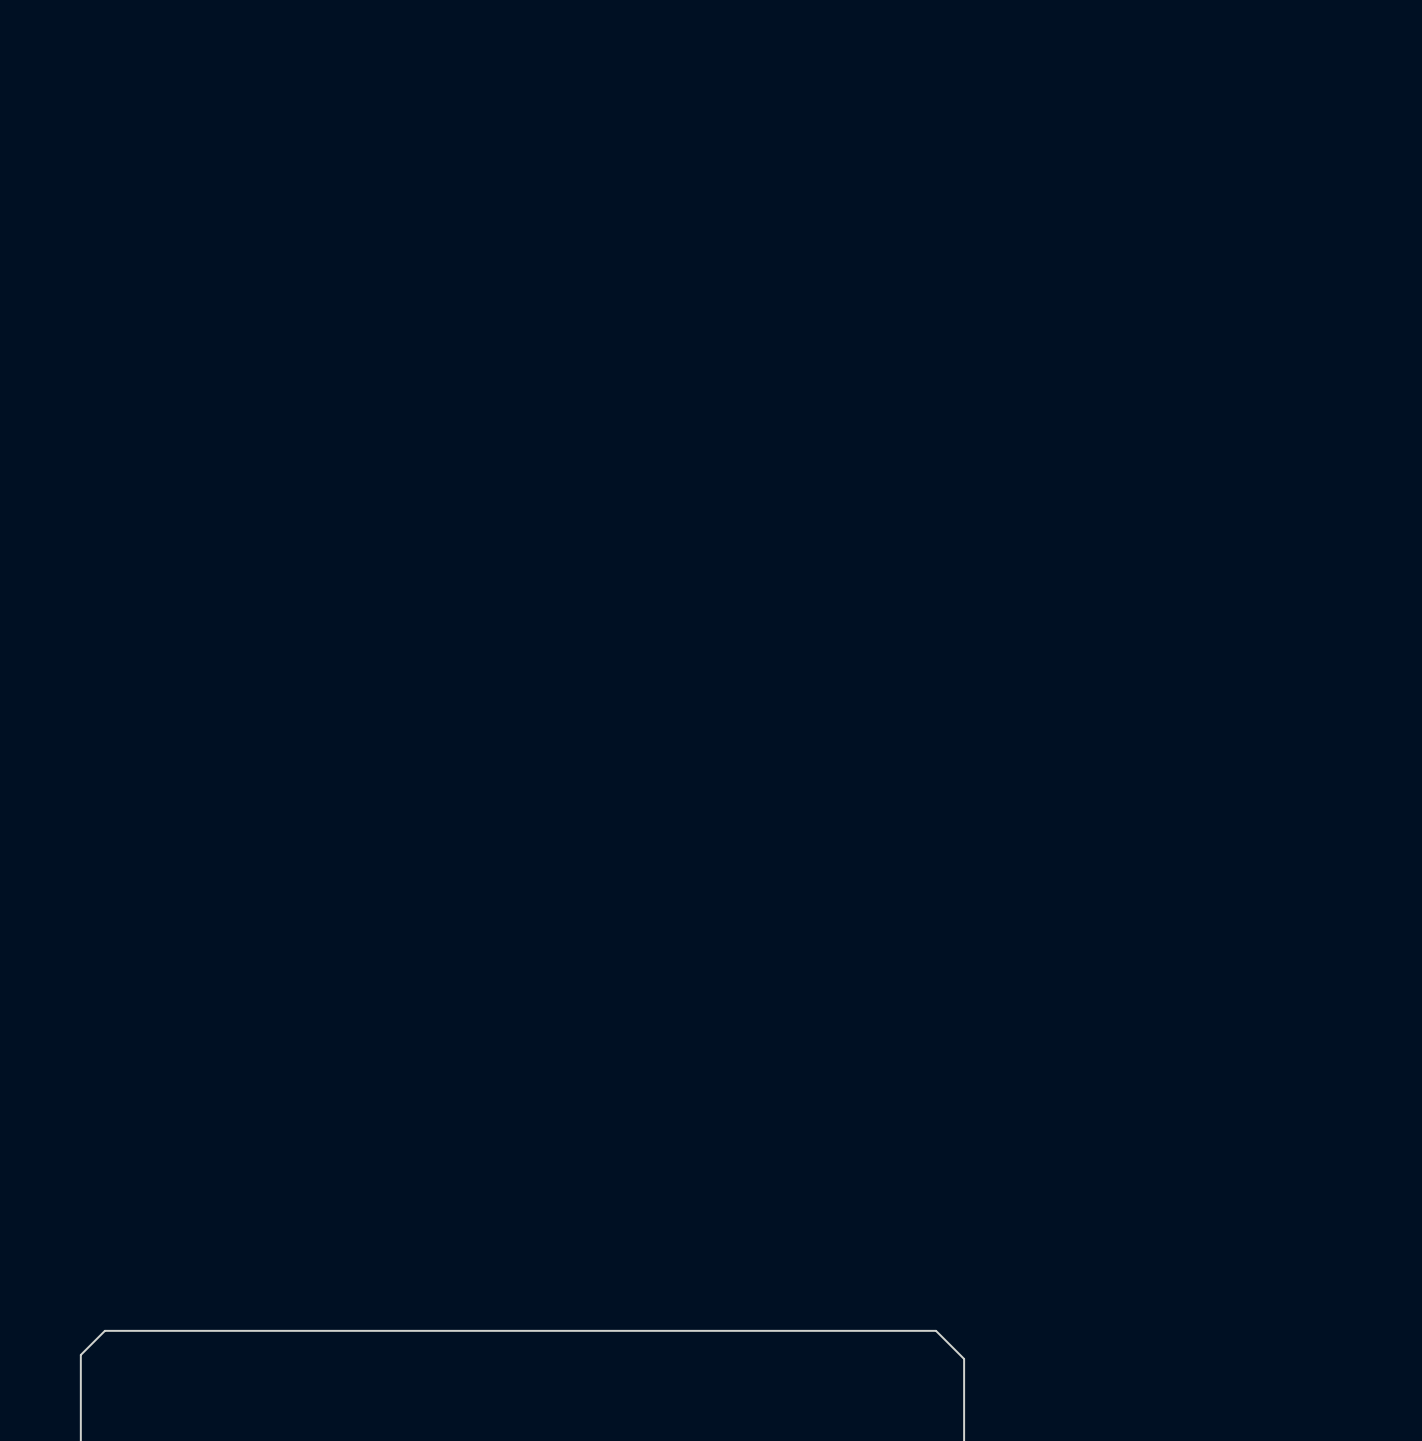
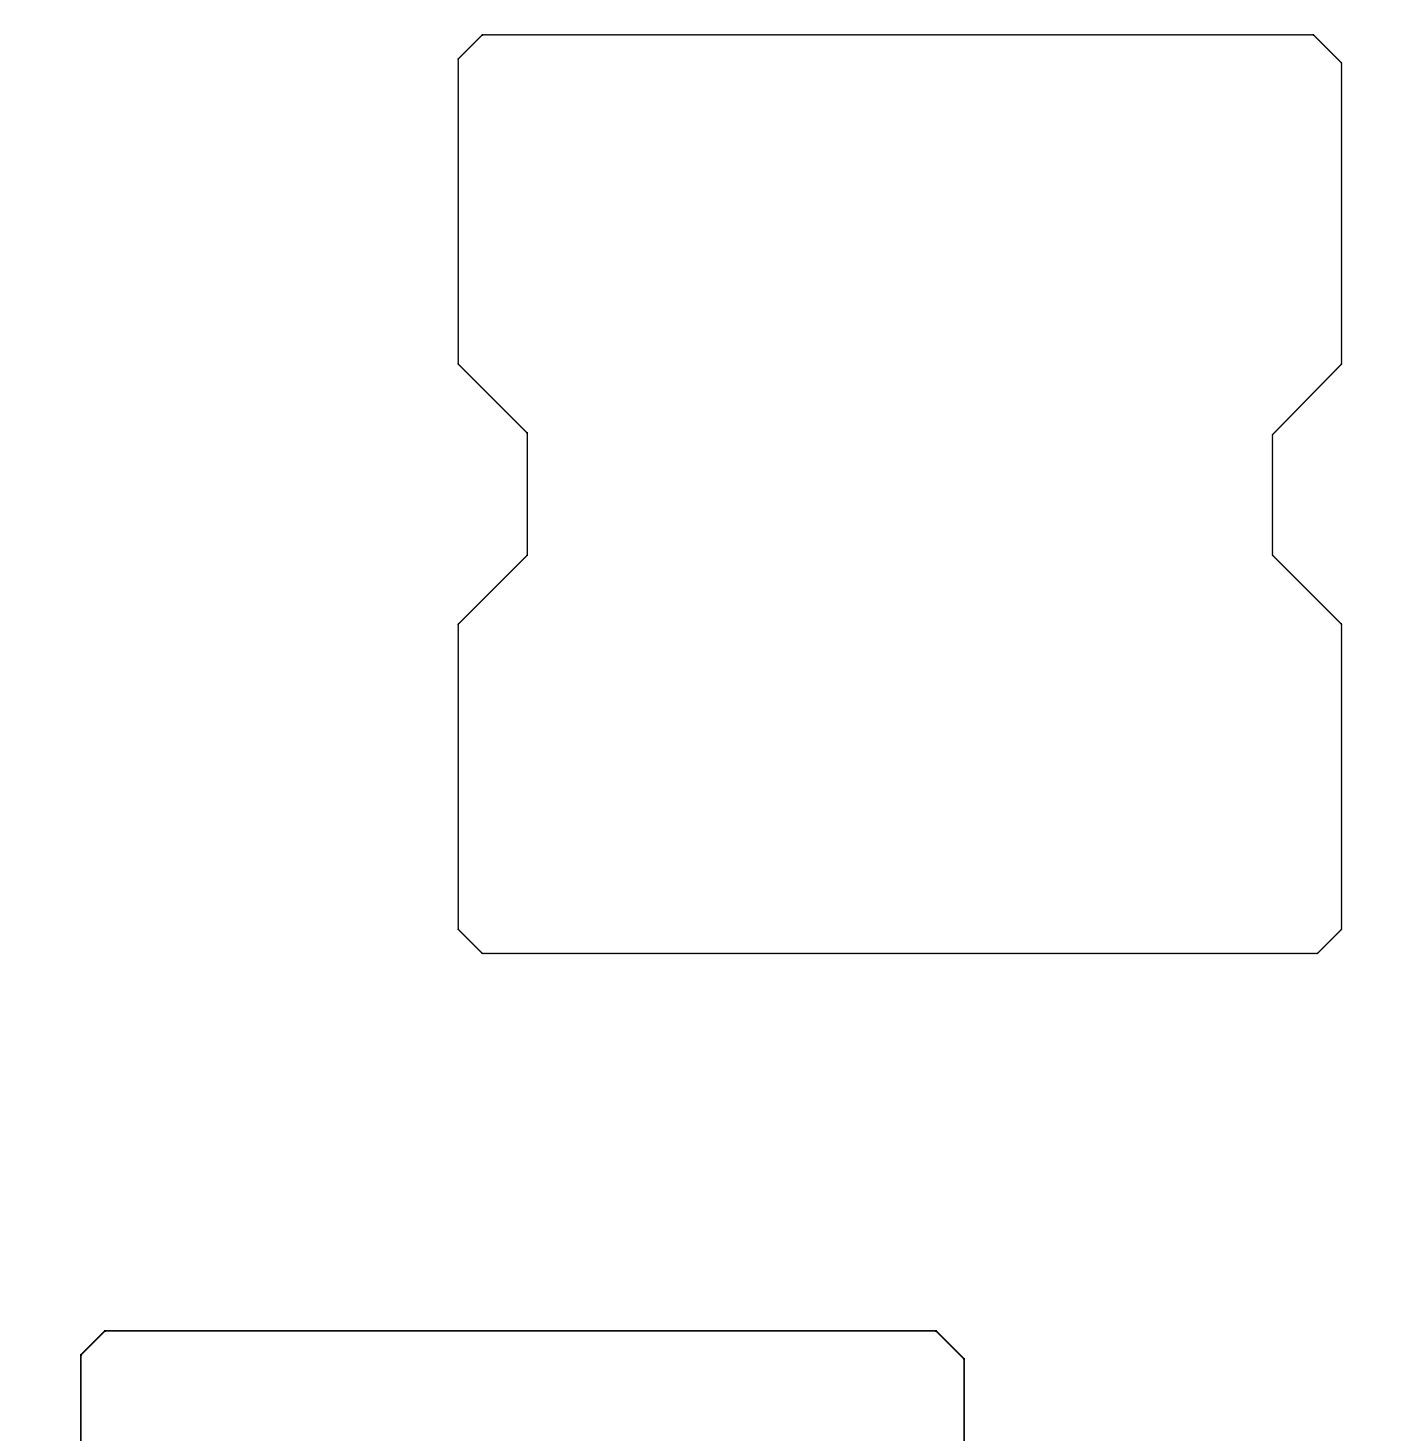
board edge: none -> (1313, 34) (482, 34) (458, 58) (458, 364) (527, 433) (527, 555) (458, 624) (458, 929) (482, 953) (1317, 953) (1341, 929) (1341, 624) (1272, 555) (1272, 434) (1341, 364) (1341, 62) (1313, 34)

